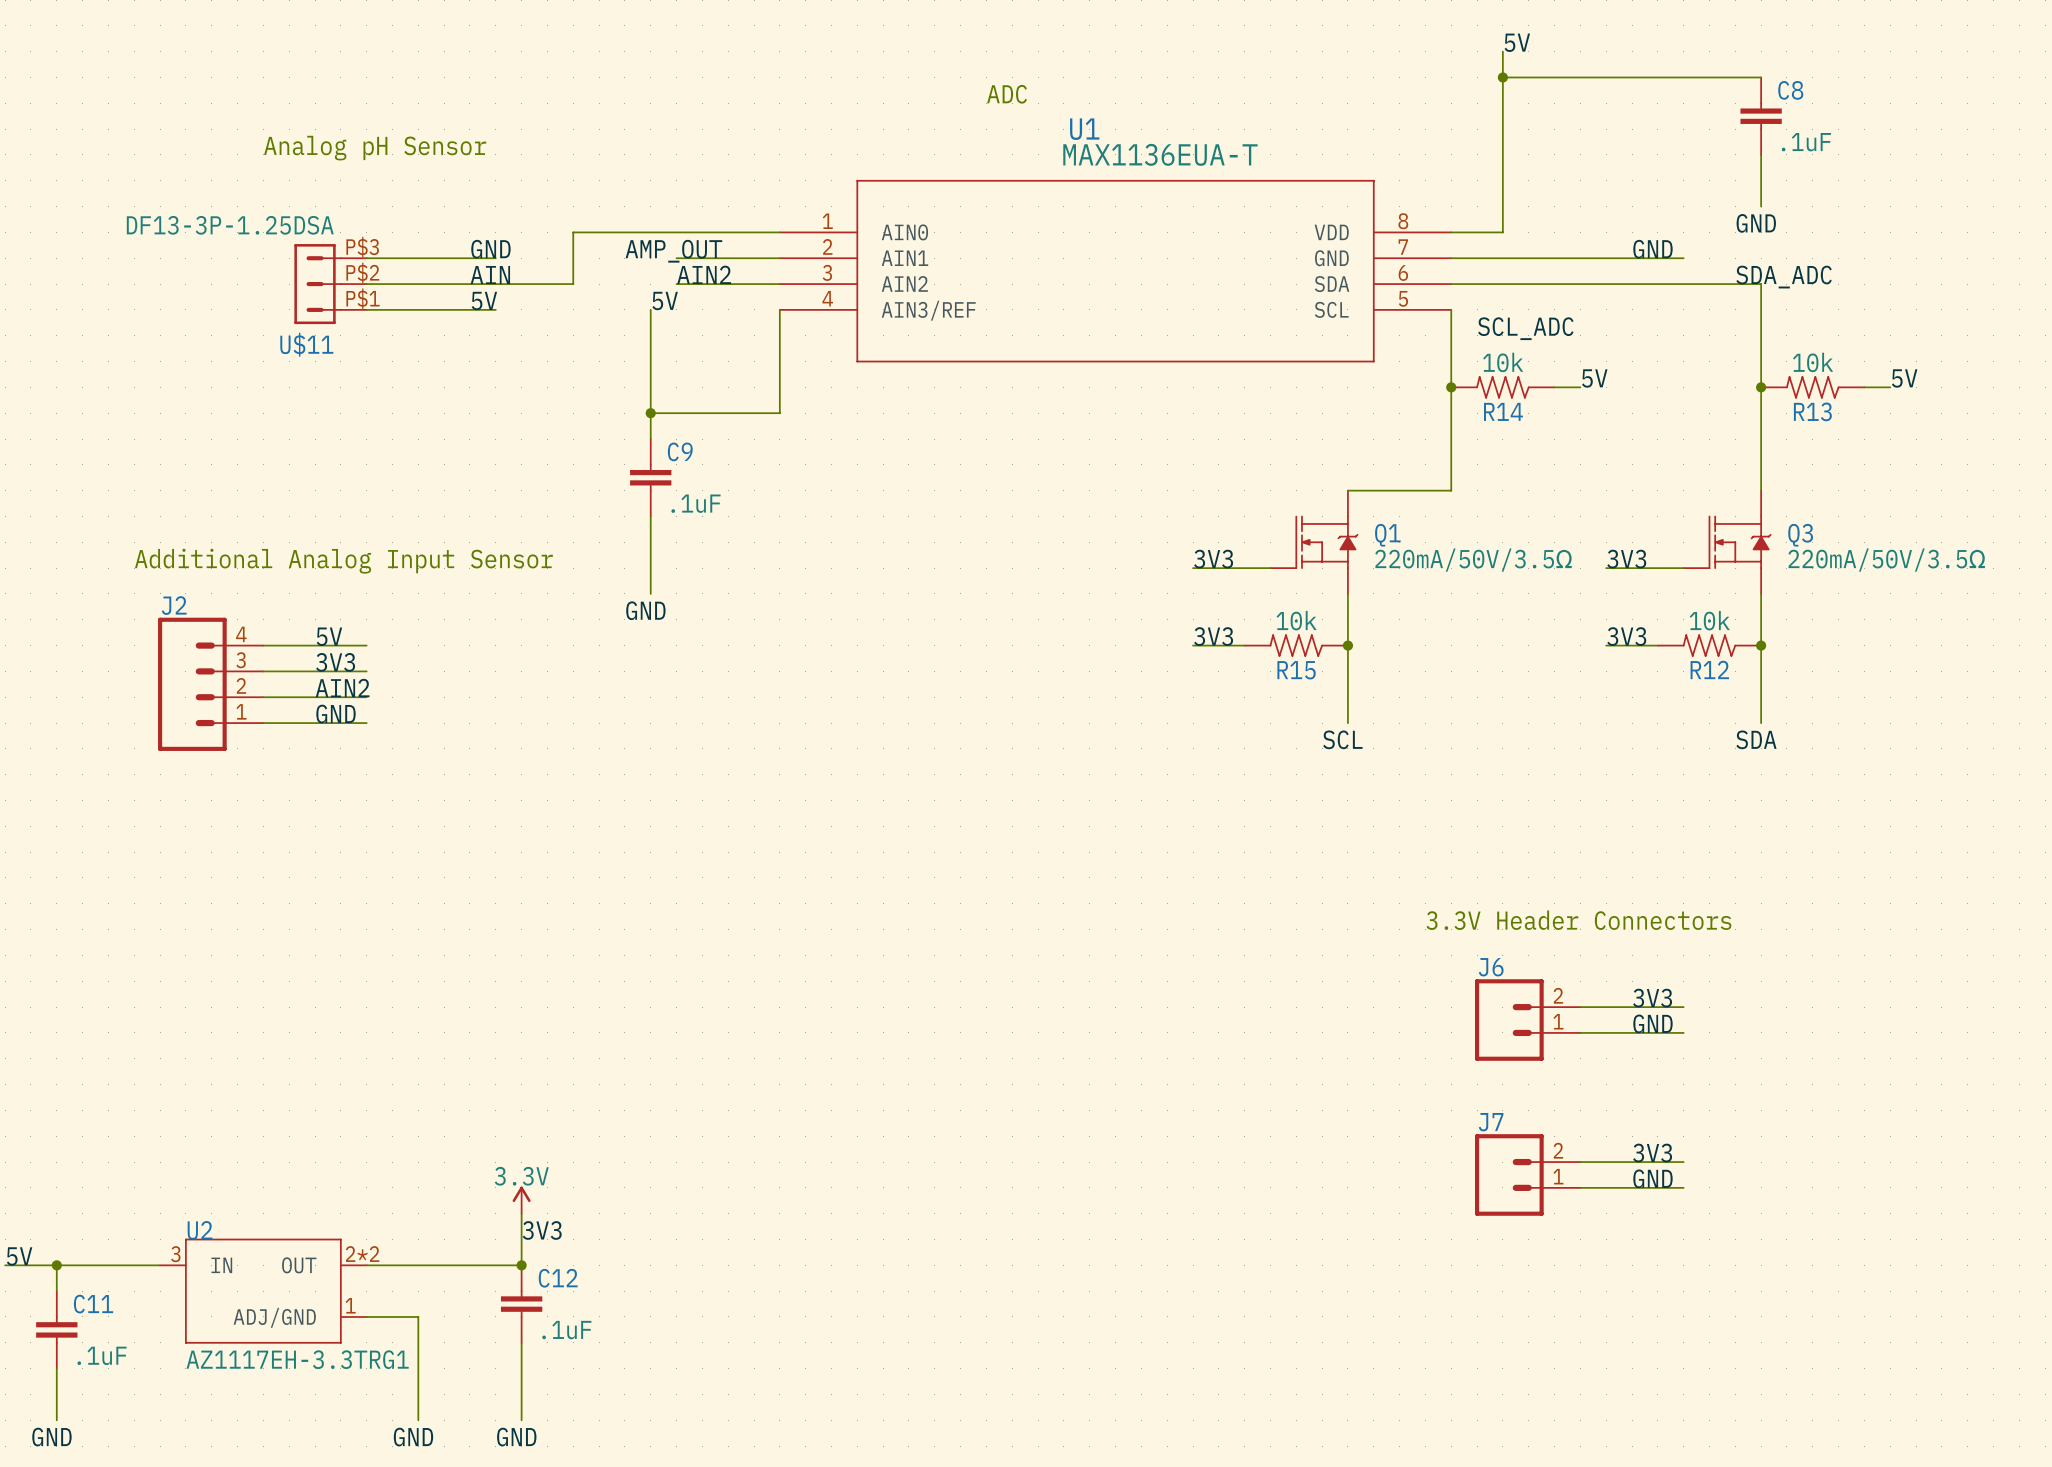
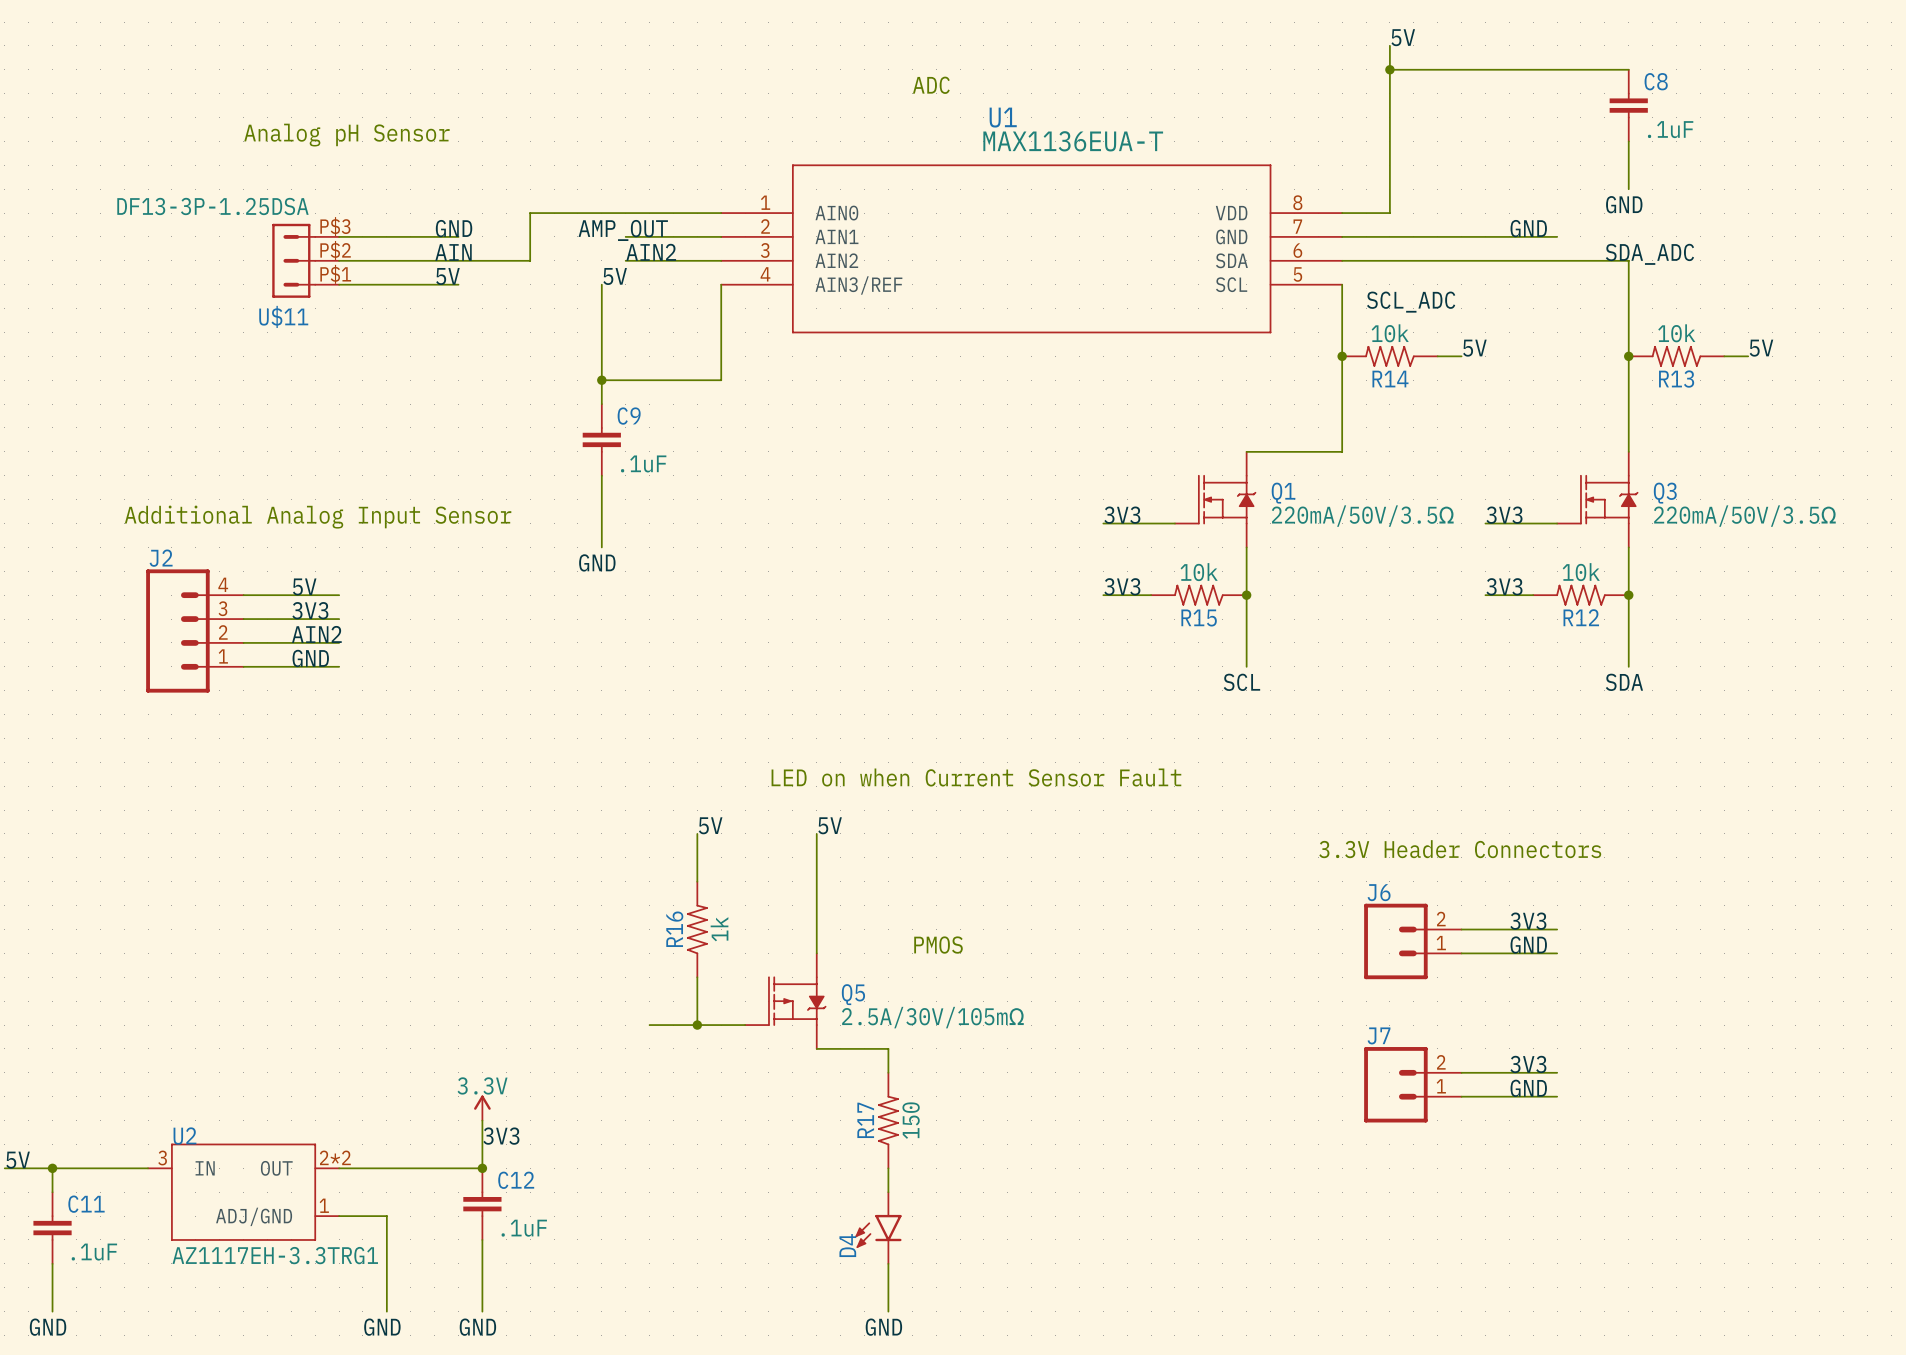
text: none -> LED on when Current Sensor Fault (976, 777)
label: none -> 5V (710, 825)
label: none -> 5V (830, 825)
wire: none -> (697, 833) (697, 881)
wire: none -> (816, 833) (816, 953)
R16: none -> 1k (697, 929)
text: none -> PMOS (938, 945)
wire: none -> (697, 977) (697, 1025)
Q5: none -> 2.5A/30V/105mΩ (785, 1001)
wire: none -> (649, 1025) (745, 1025)
junction: none -> (697, 1025)
wire: none -> (816, 1048) (888, 1048) (888, 1072)
R17: none -> 150 (888, 1120)
wire: none -> (888, 1168) (888, 1192)
D4: none -> (878, 1228)
wire: none -> (888, 1263) (888, 1311)
label: none -> GND (883, 1327)

